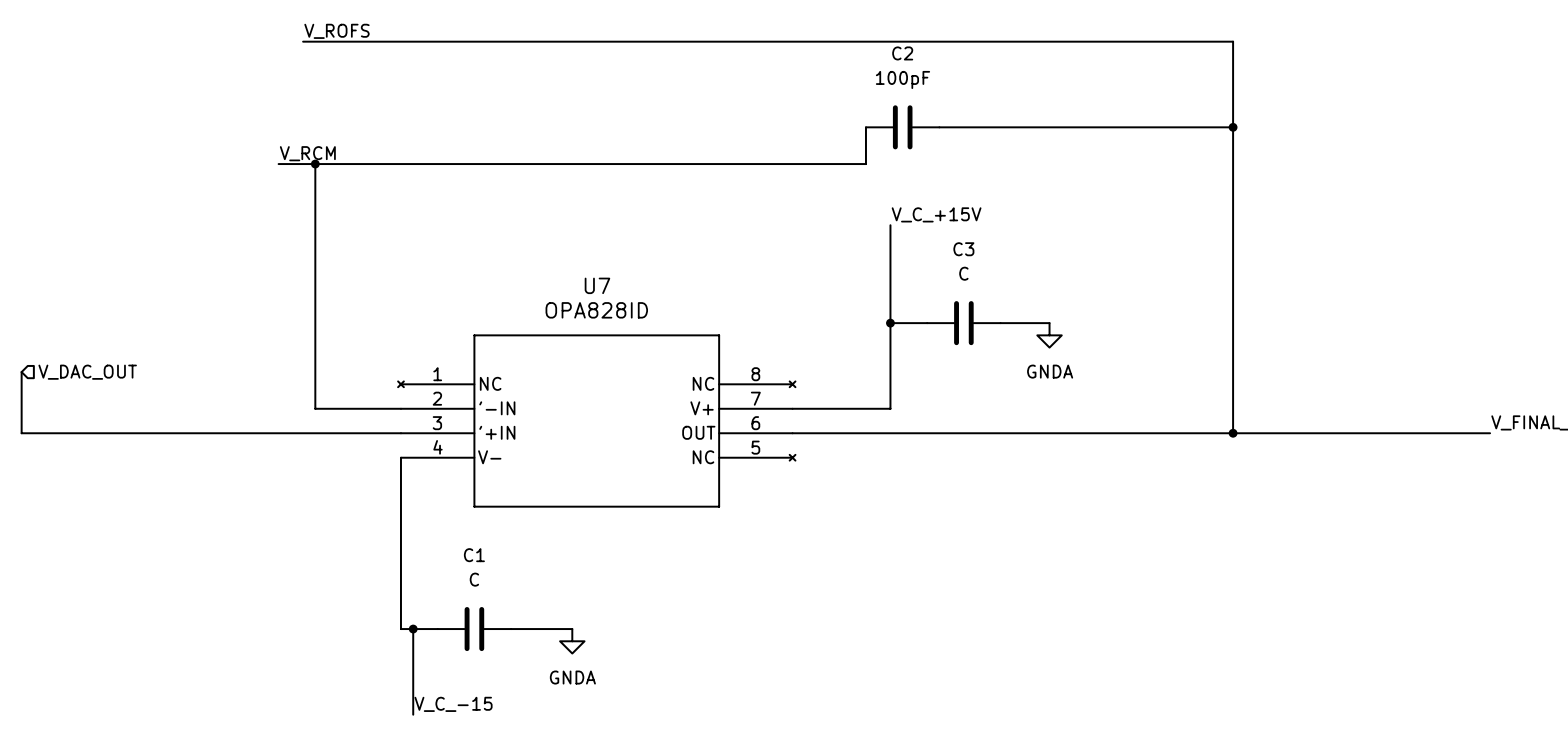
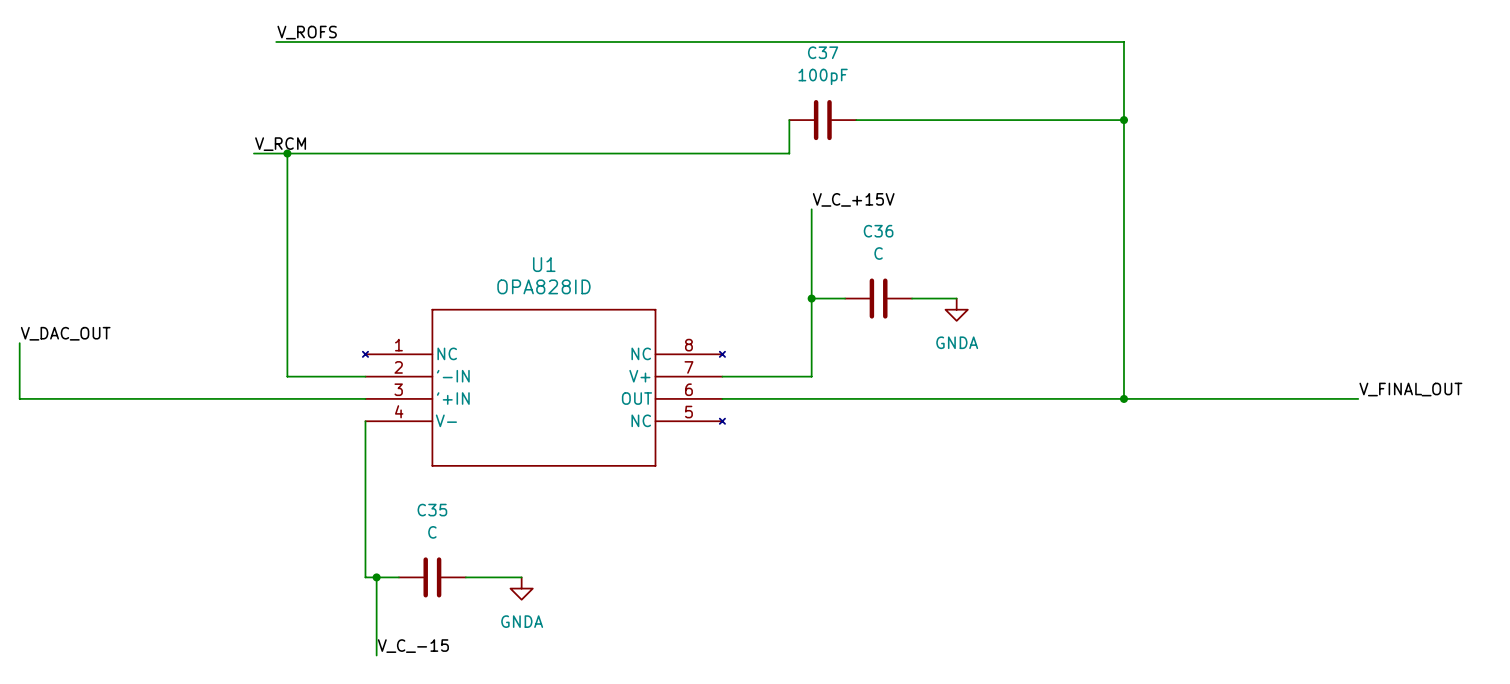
C2 name: C2 (902, 53) -> C37 (823, 52)
C3 name: C3 (963, 249) -> C36 (878, 231)
U7 name: U7 (597, 285) -> U1 (544, 264)
label: none -> V_DAC_OUT (65, 333)
hierarchical label: V_DAC_OUT (87, 372) -> none
C1 name: C1 (474, 555) -> C35 (432, 510)

